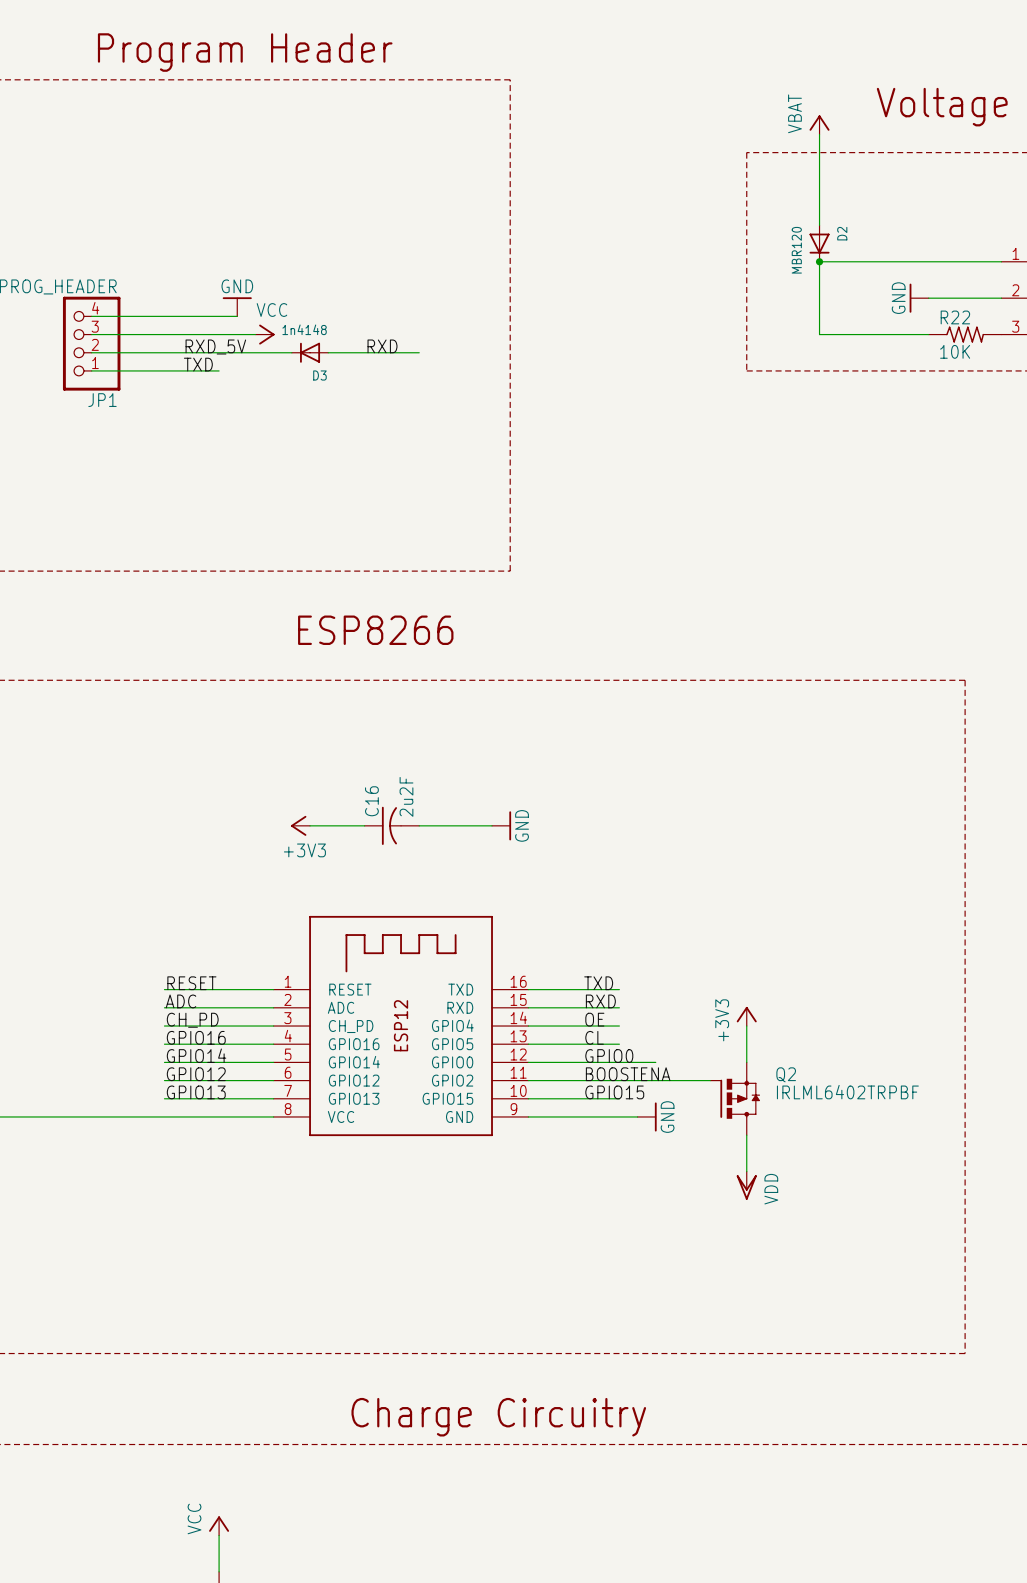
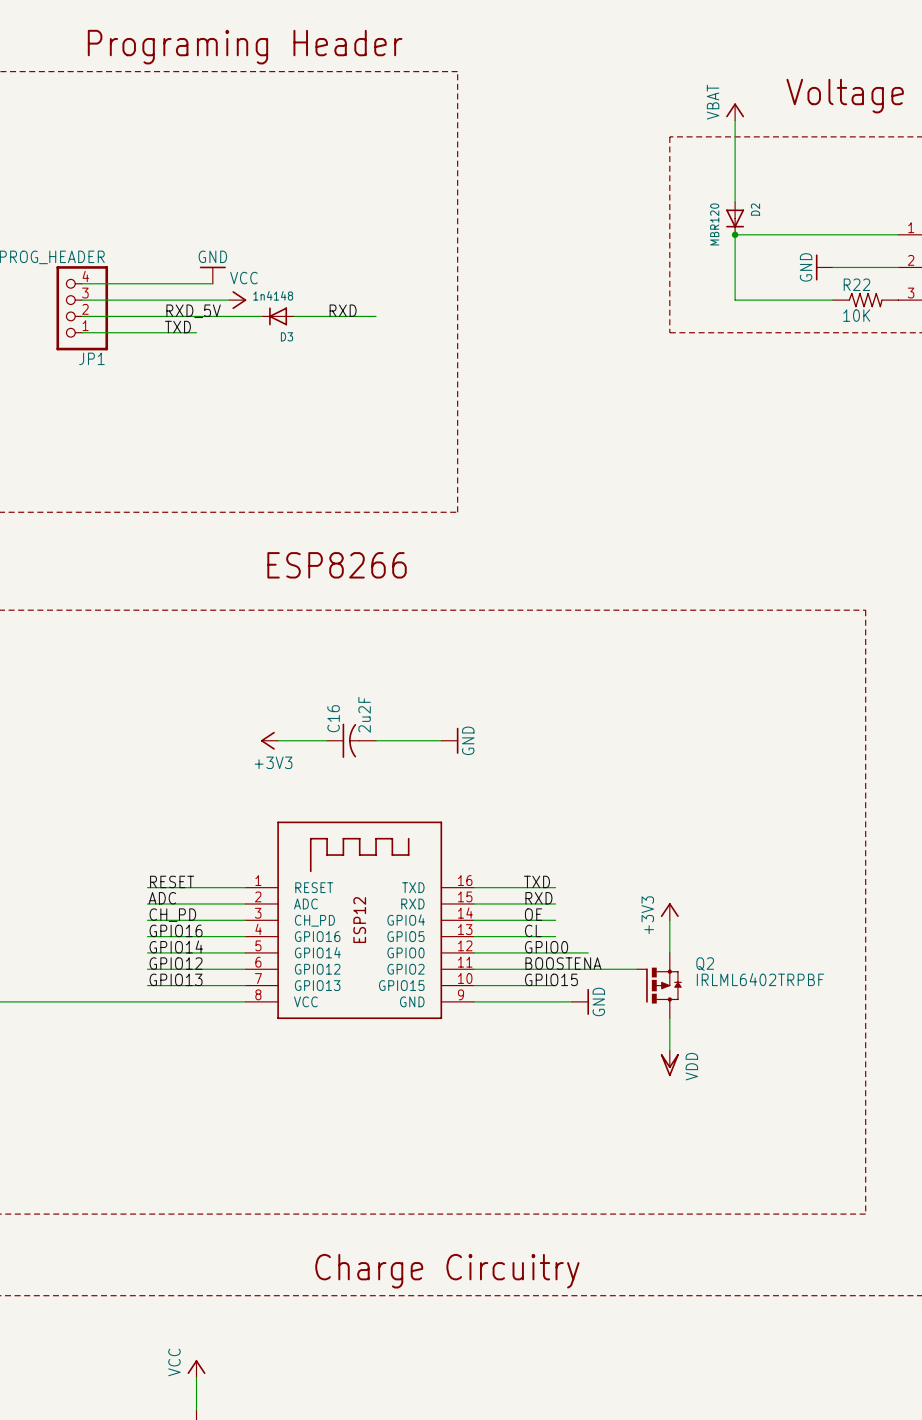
text: Program Header (245, 52) -> Programing Header (245, 47)

